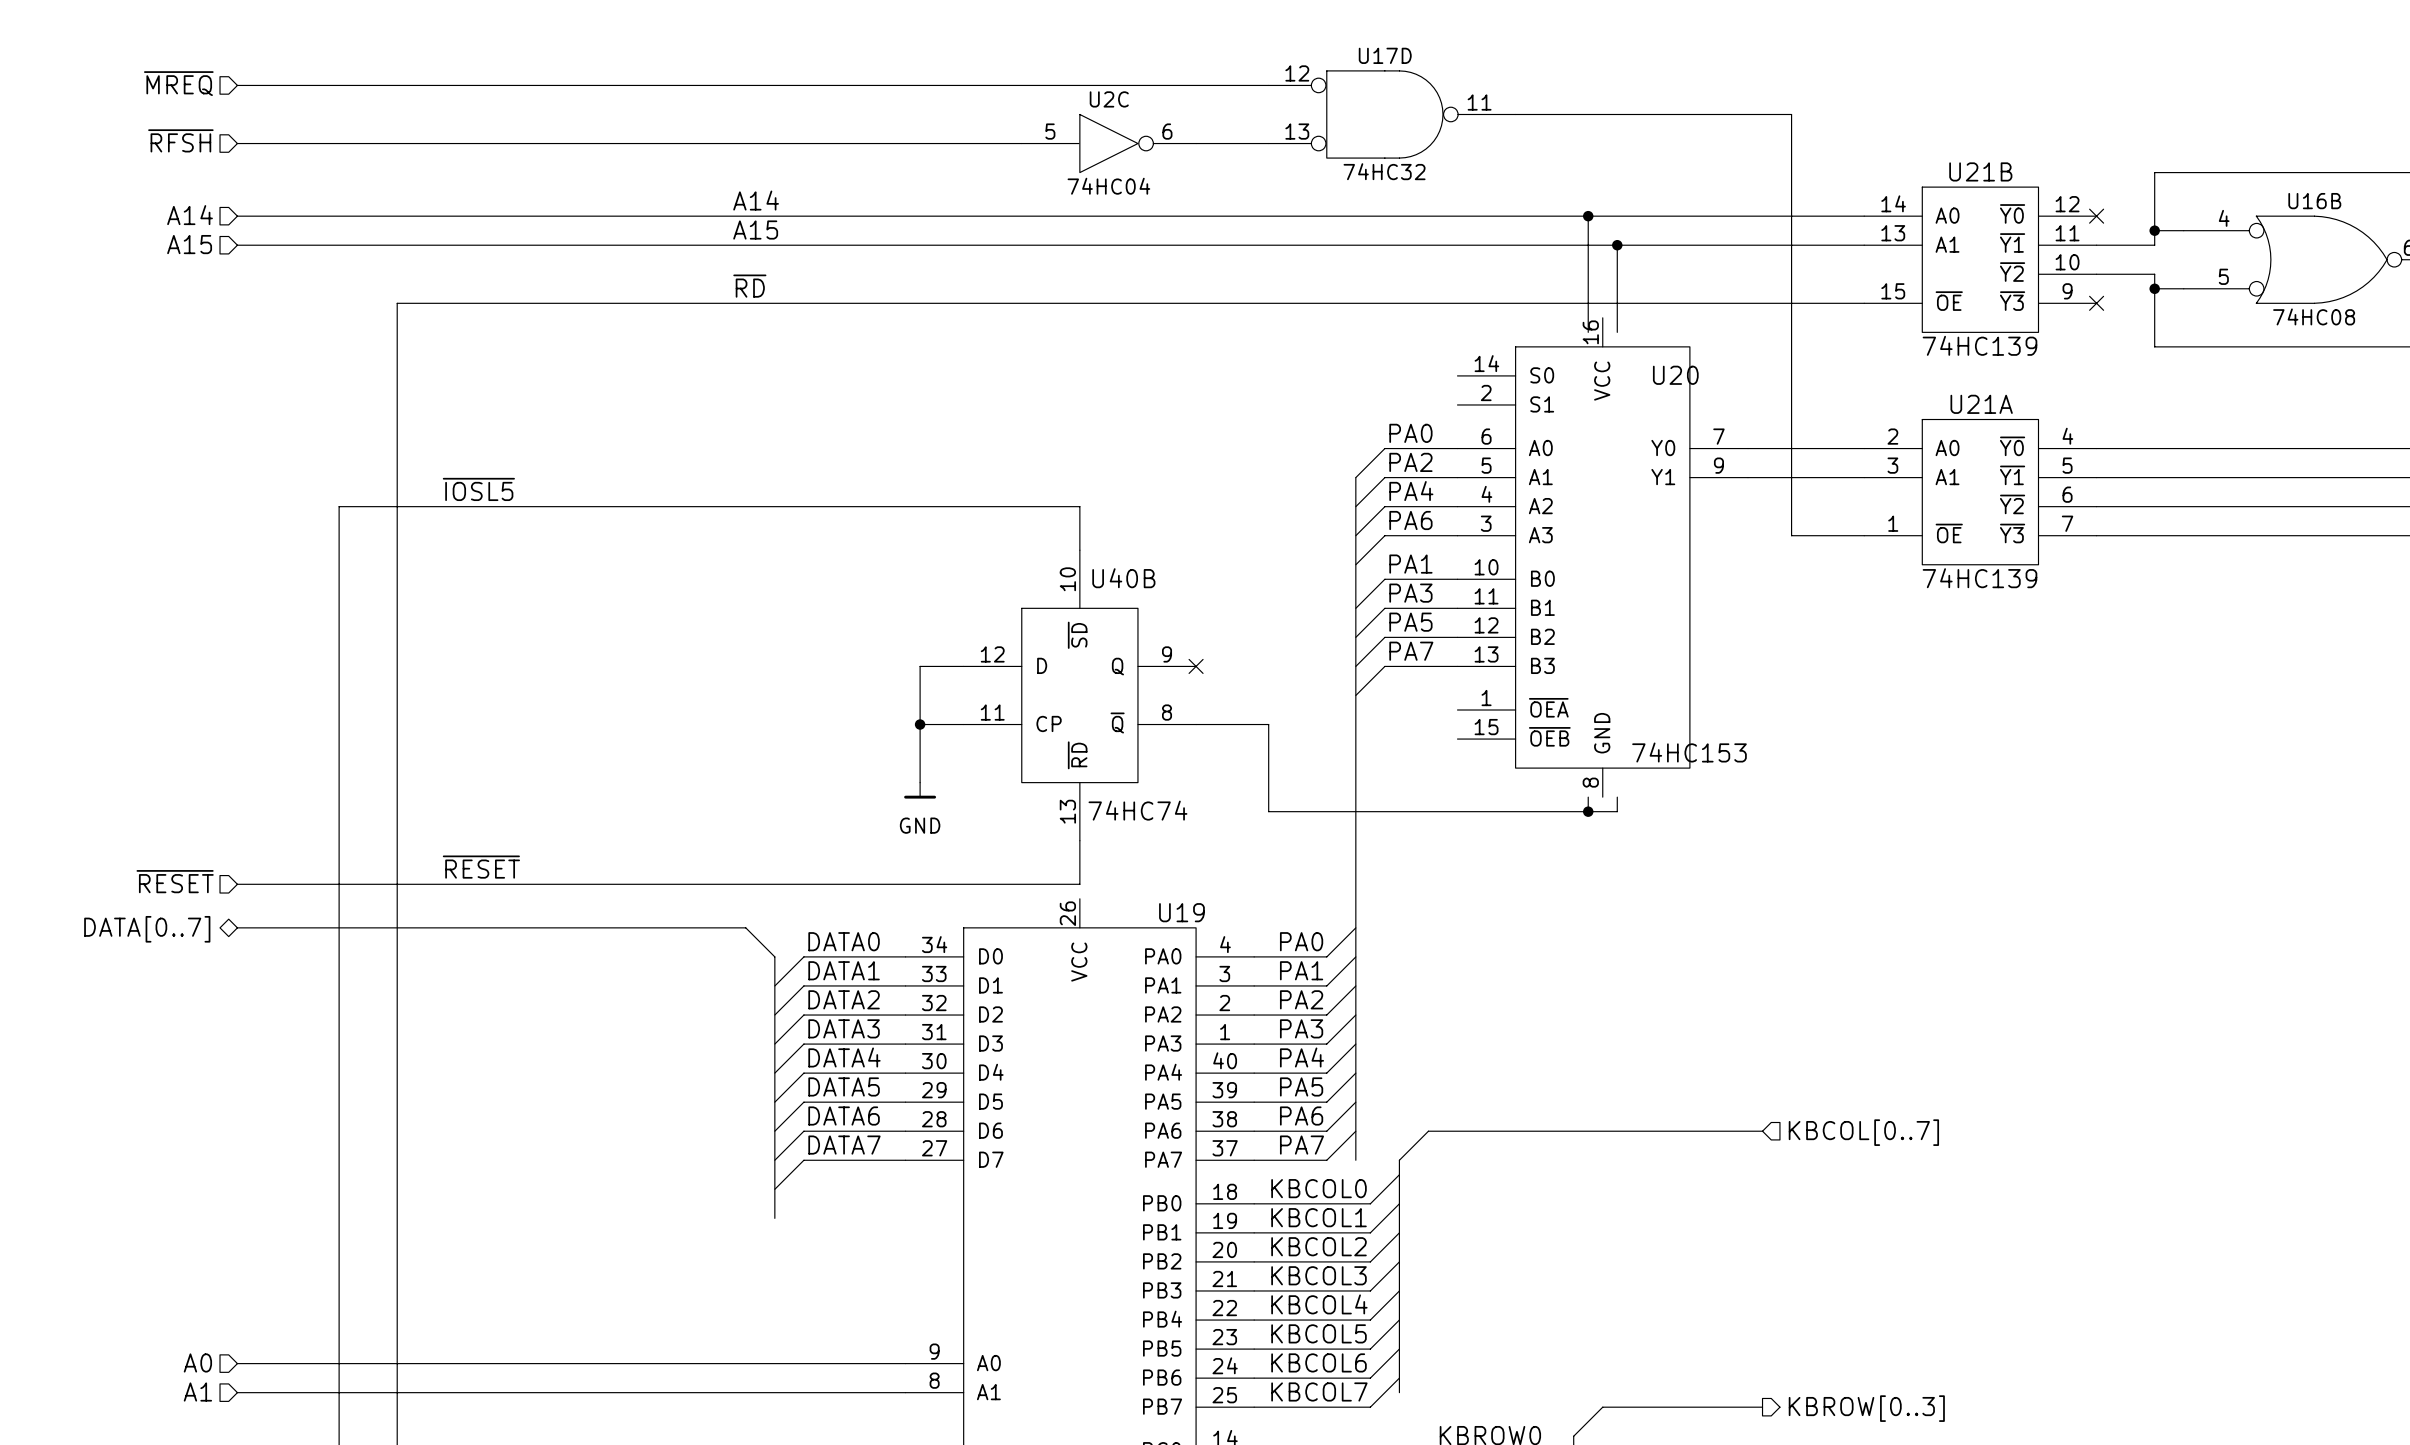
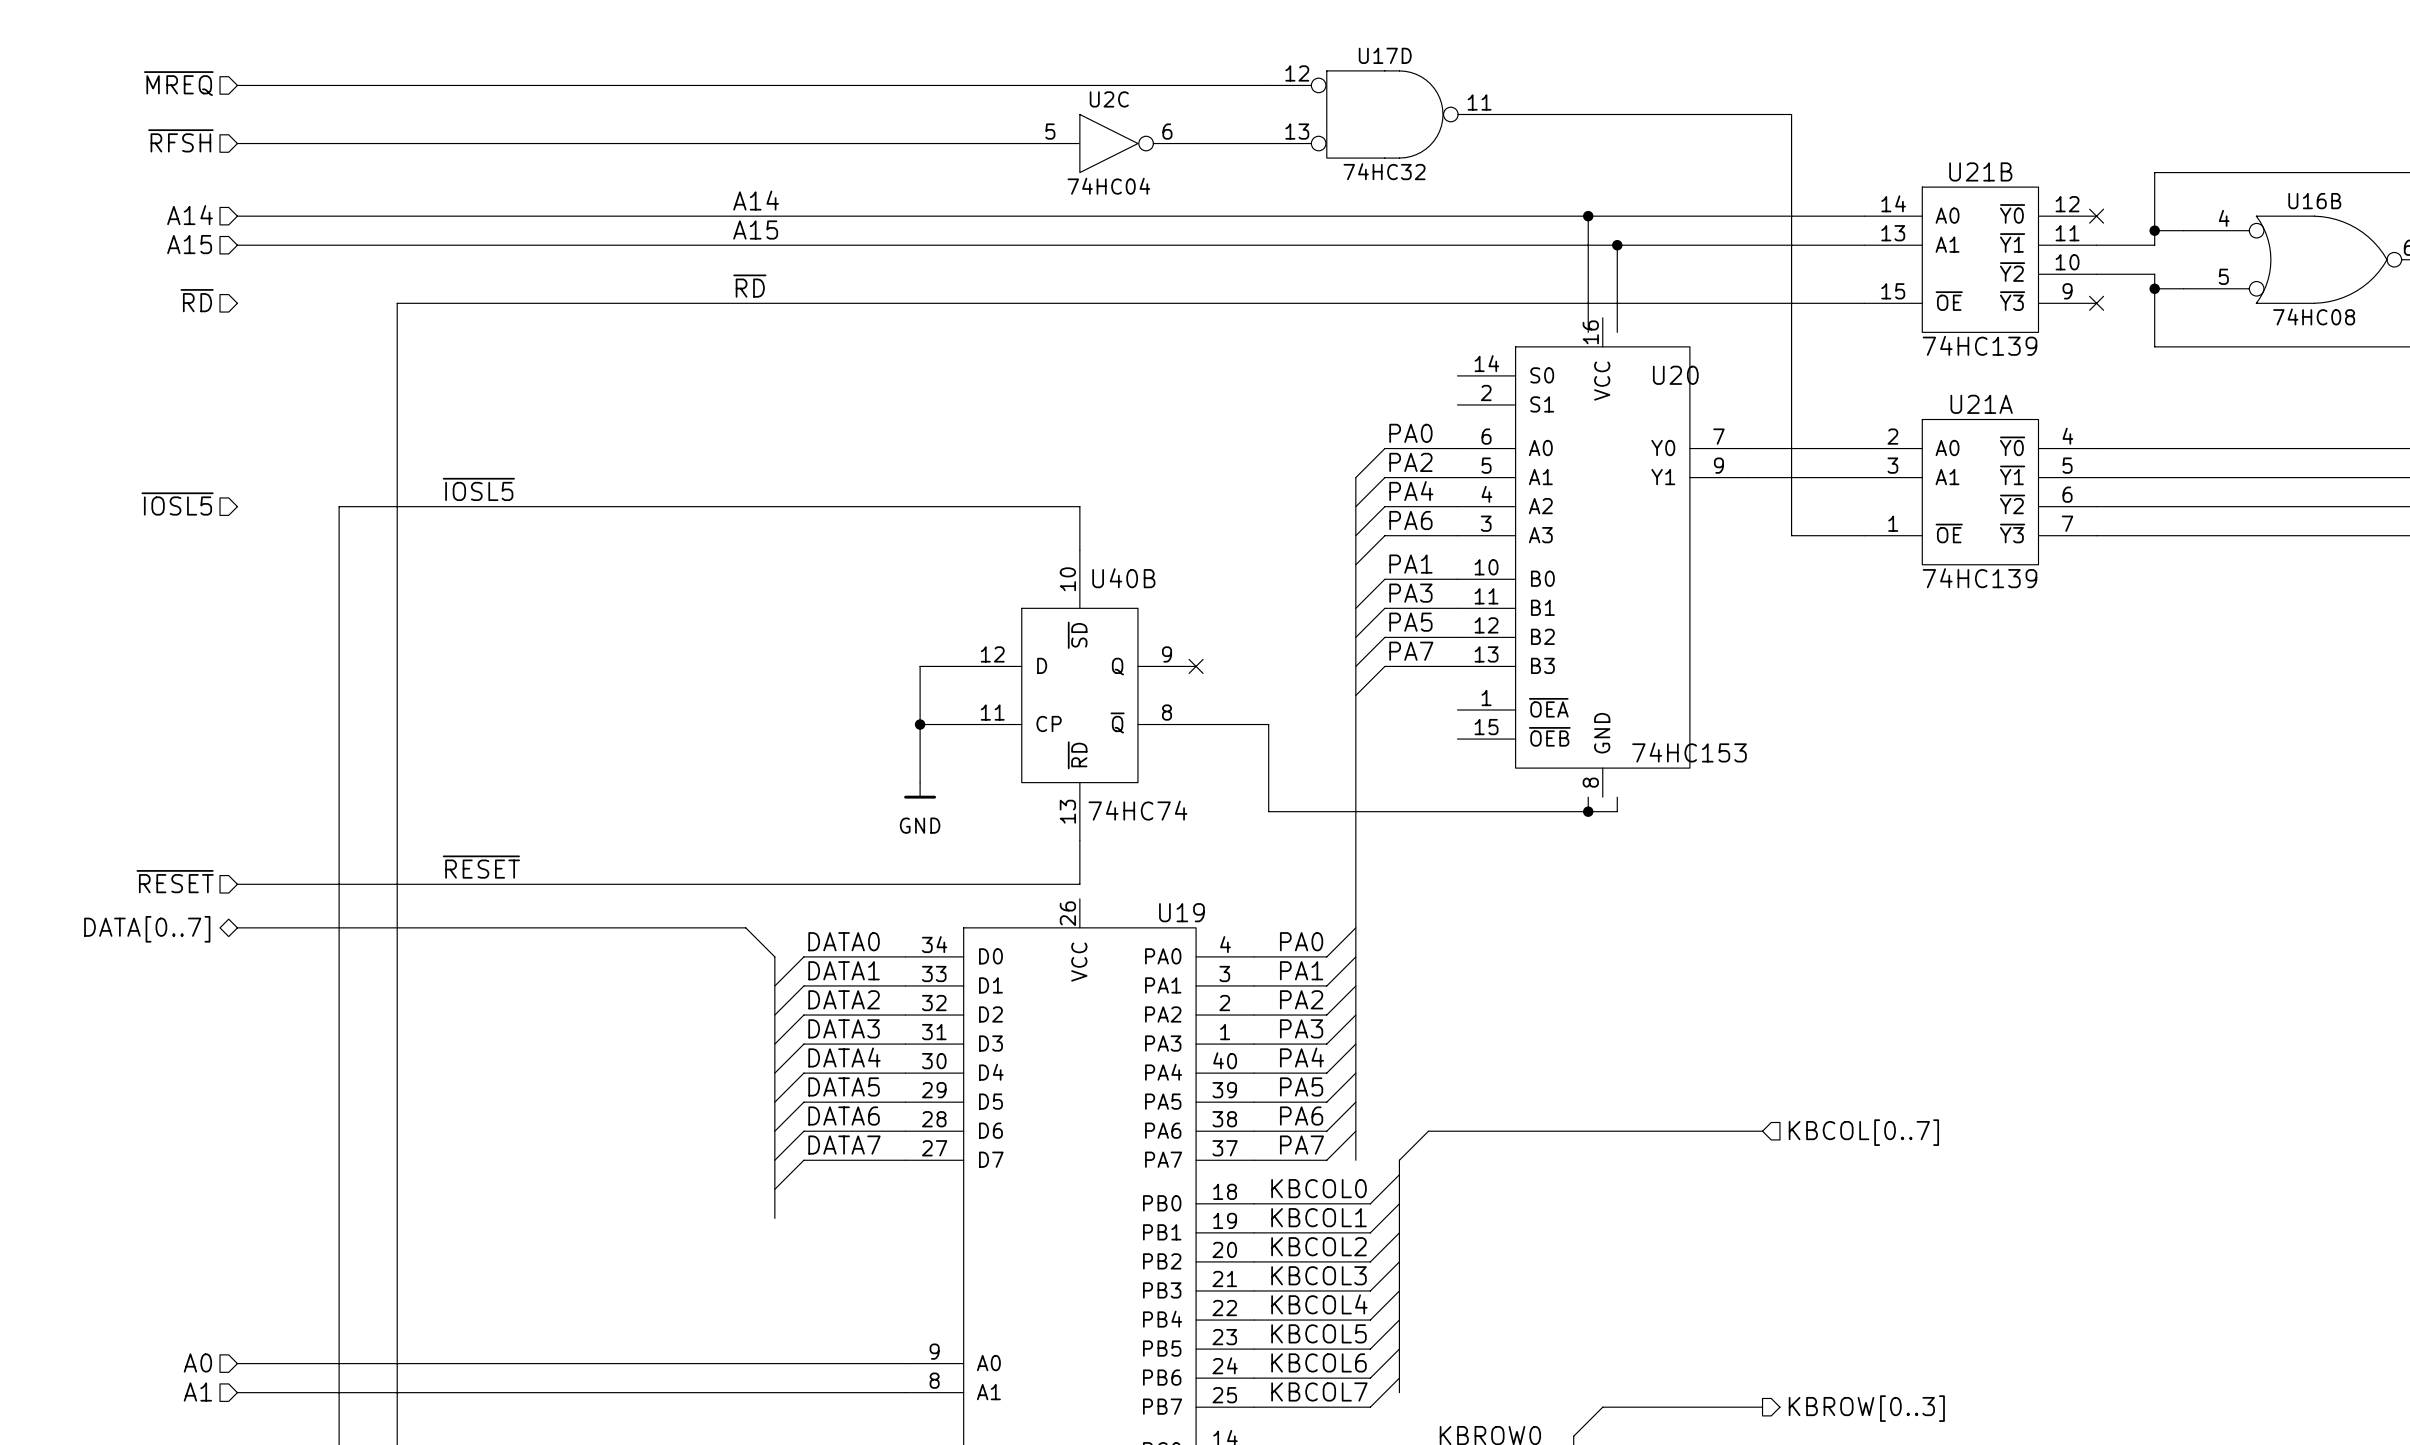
hierarchical label: none -> ~{RD} (197, 300)
hierarchical label: none -> ~{IOSL5} (177, 504)

